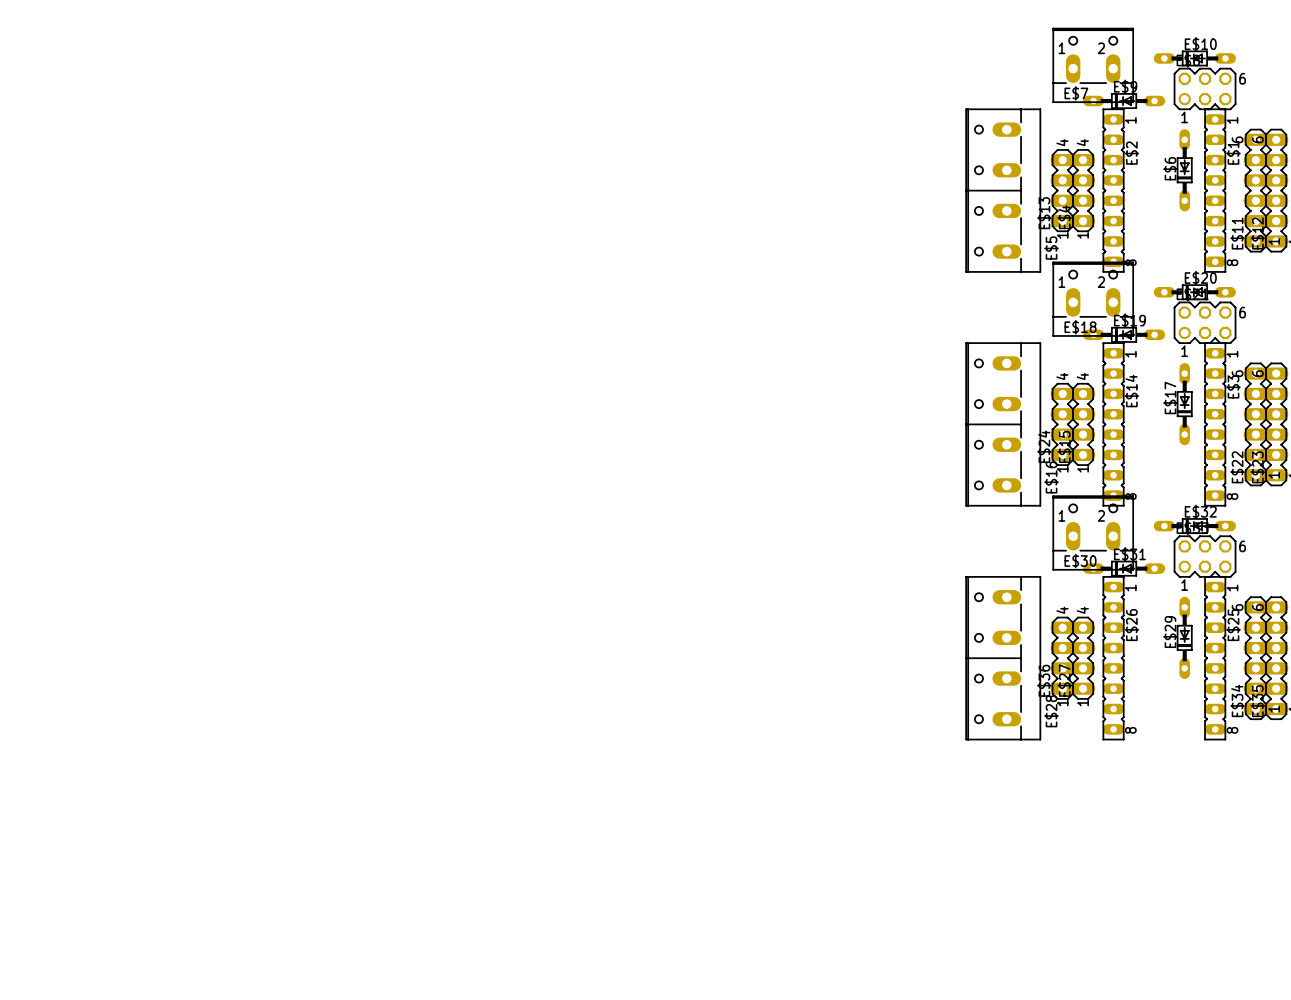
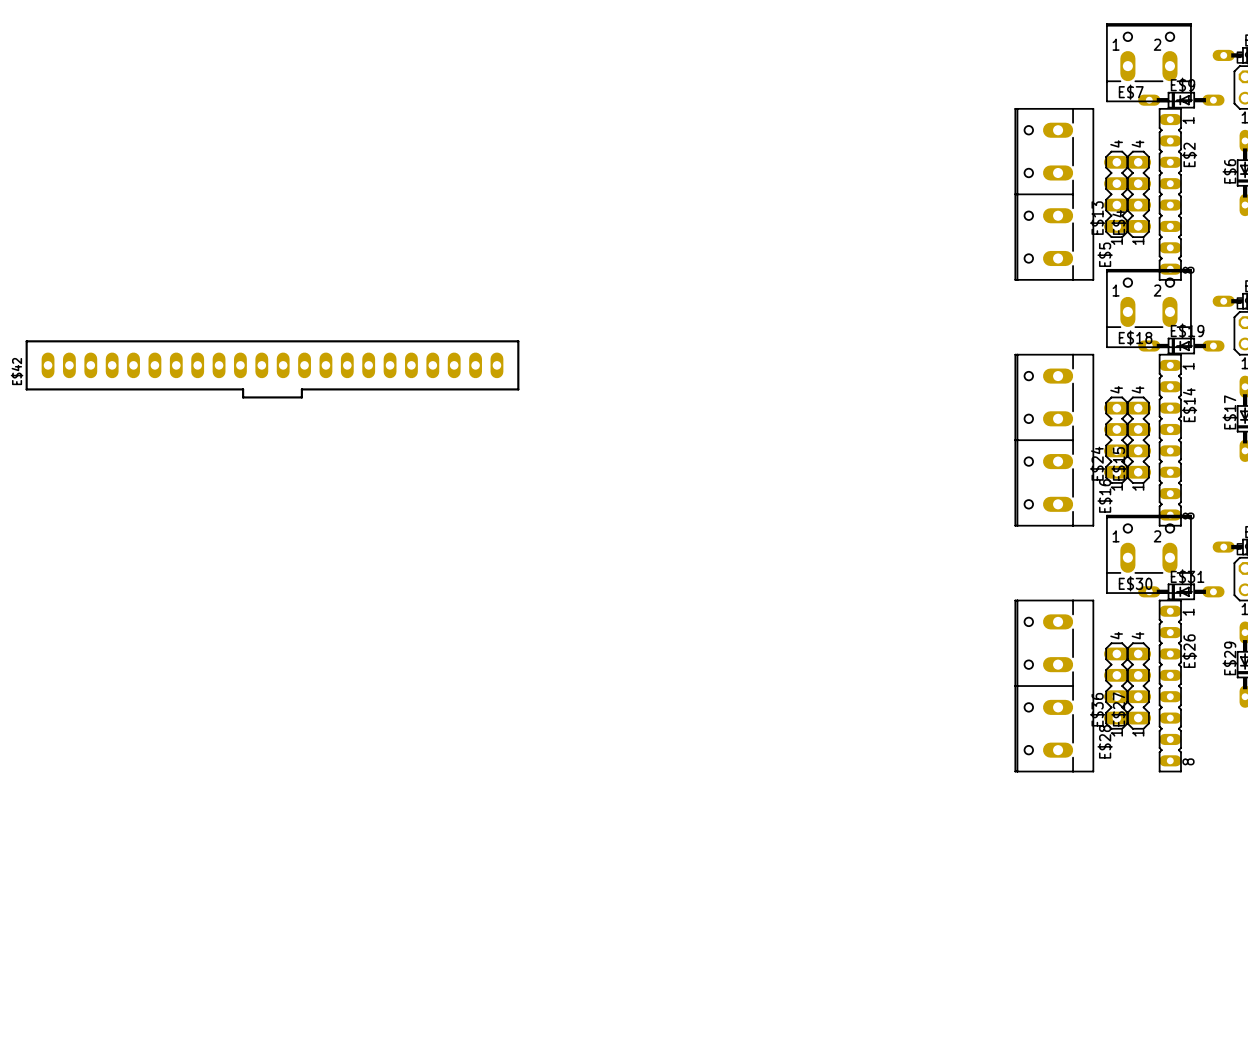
E$42: none -> (272, 369)

